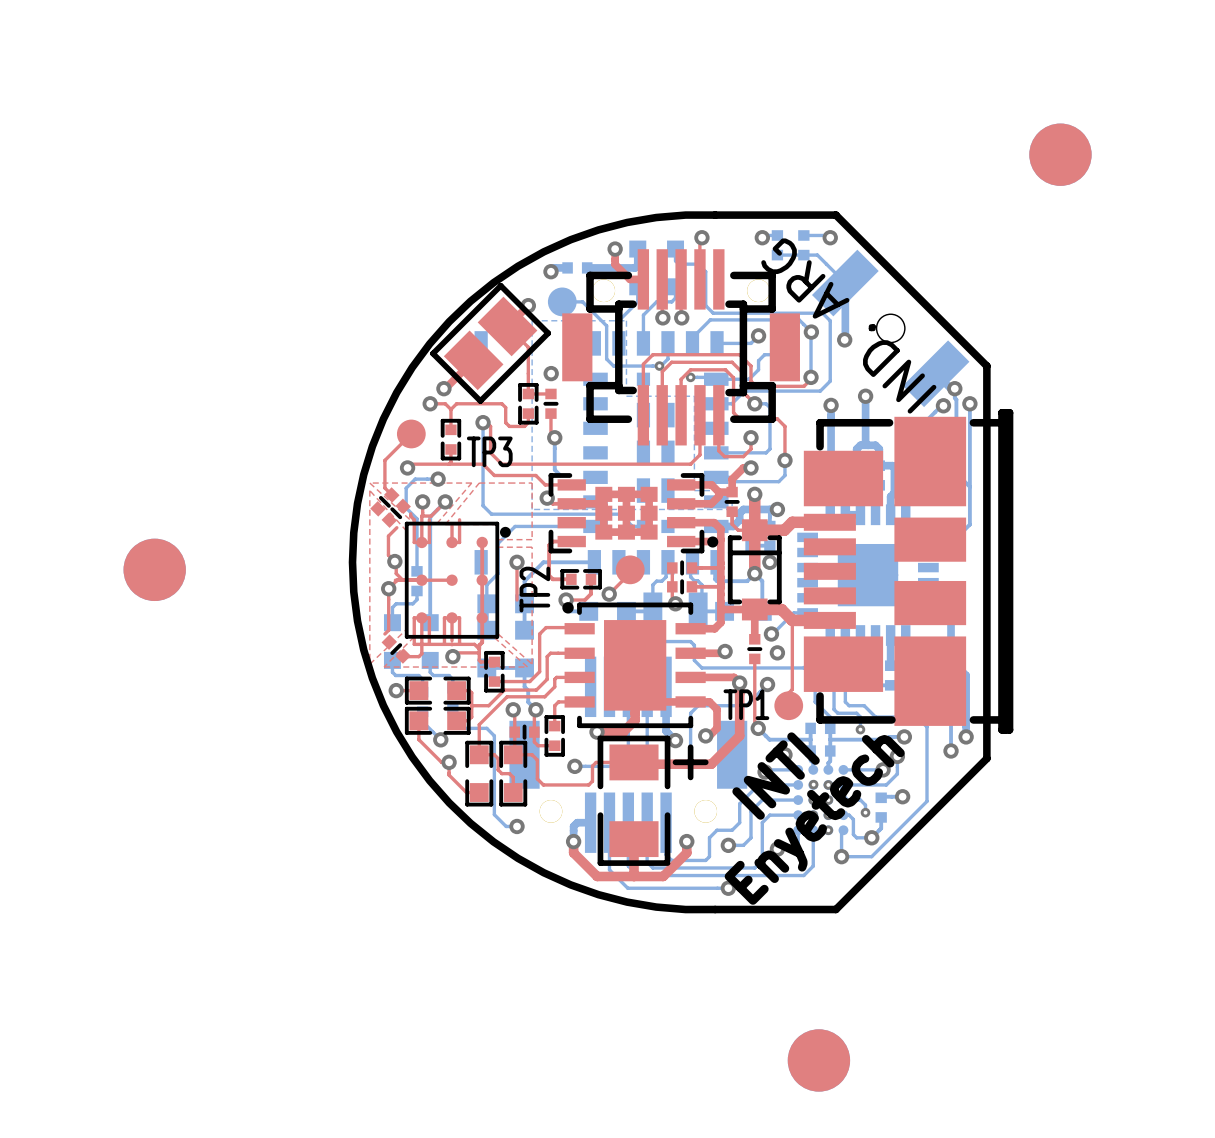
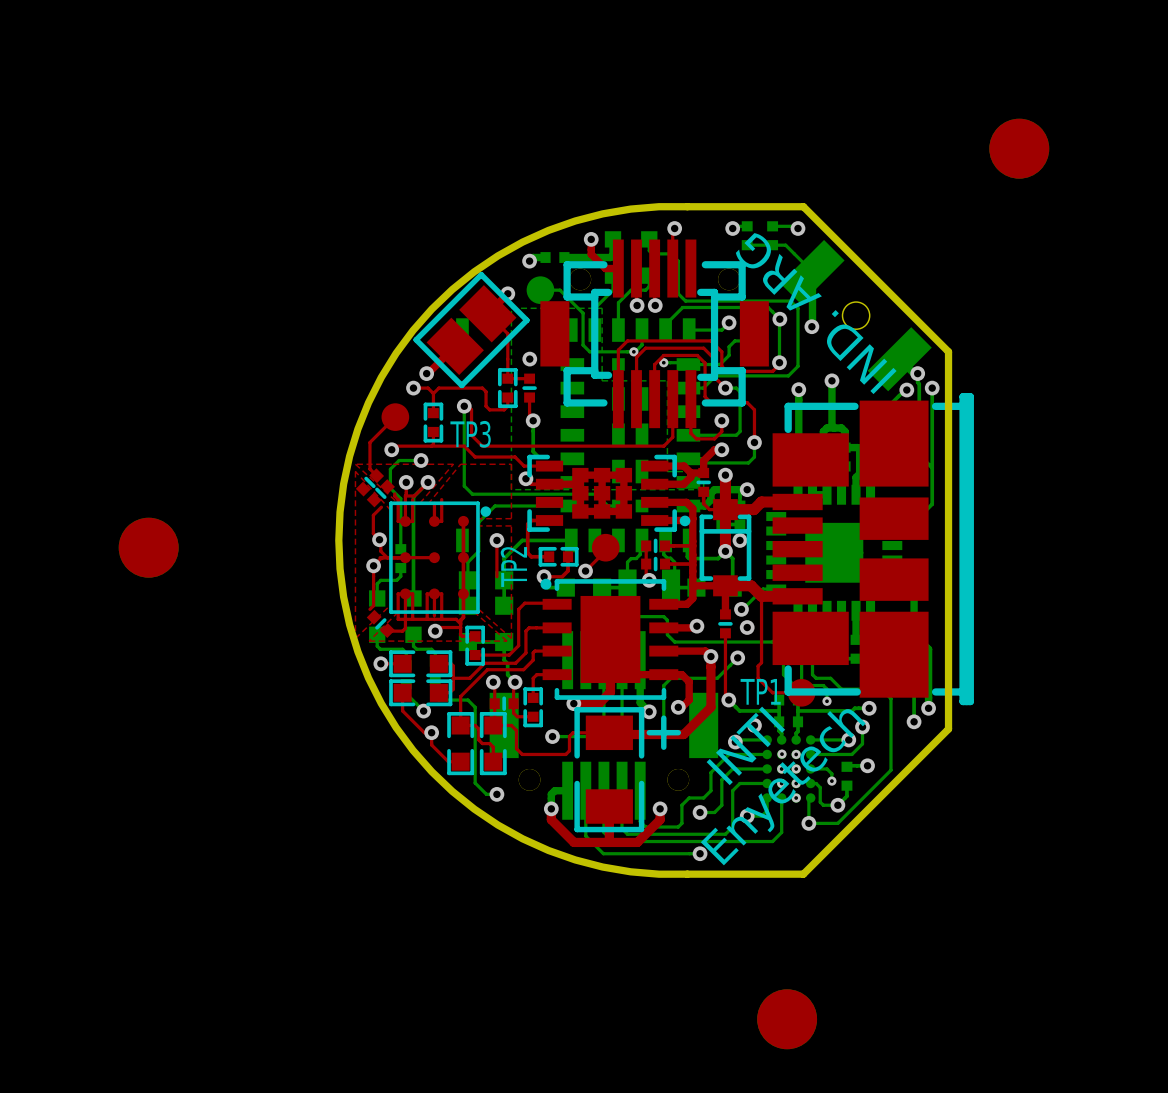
top track: none -> (758, 678) (772, 692) (801, 692)
TP1 position: (788, 705) -> (801, 692)

